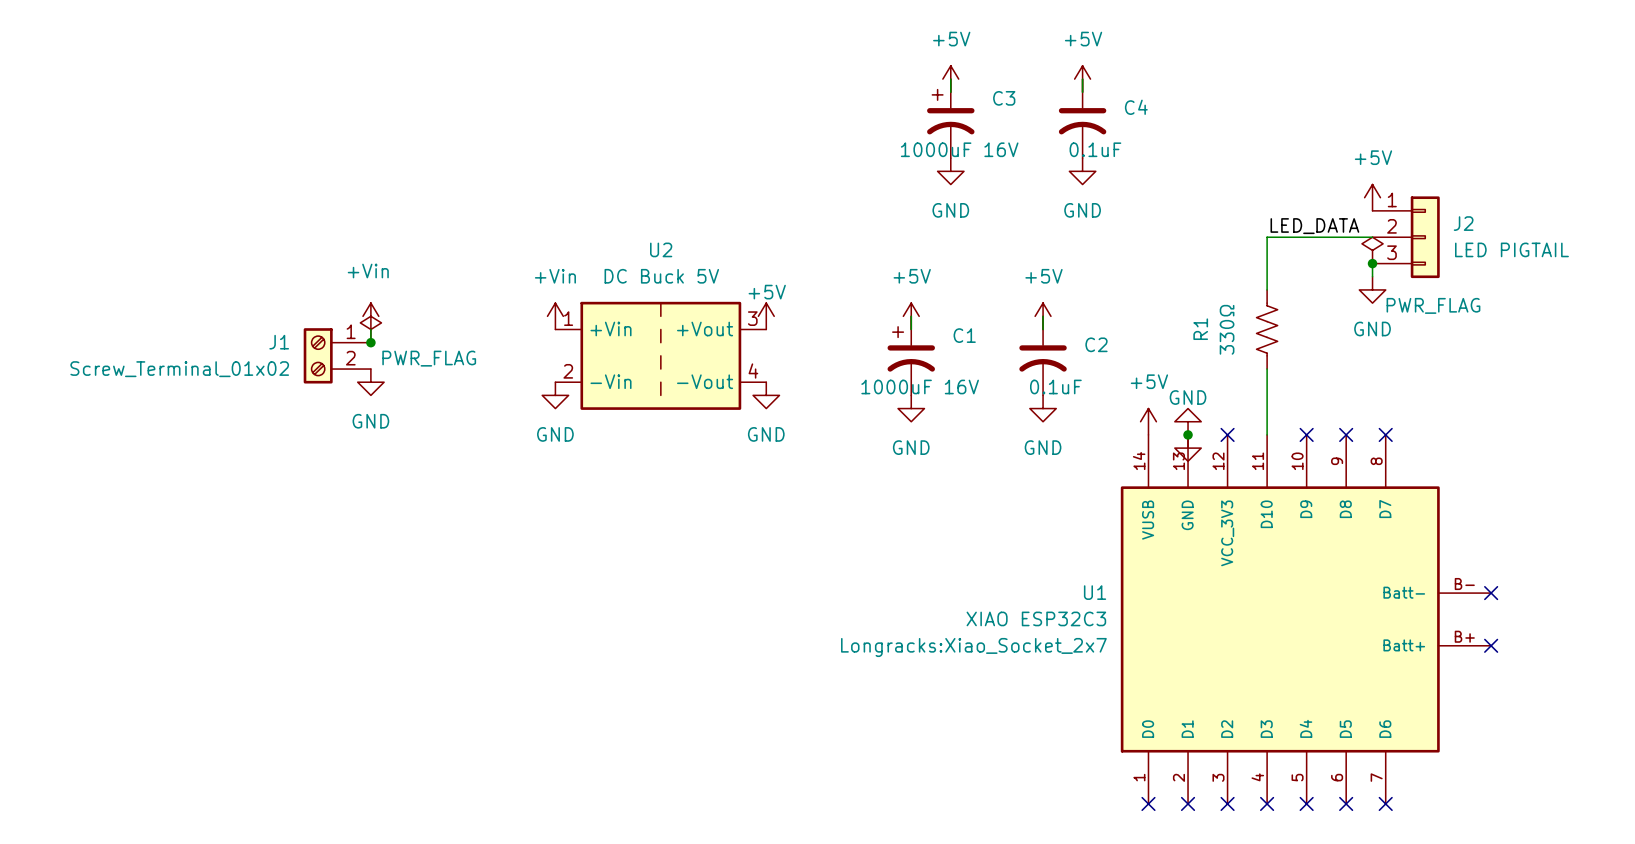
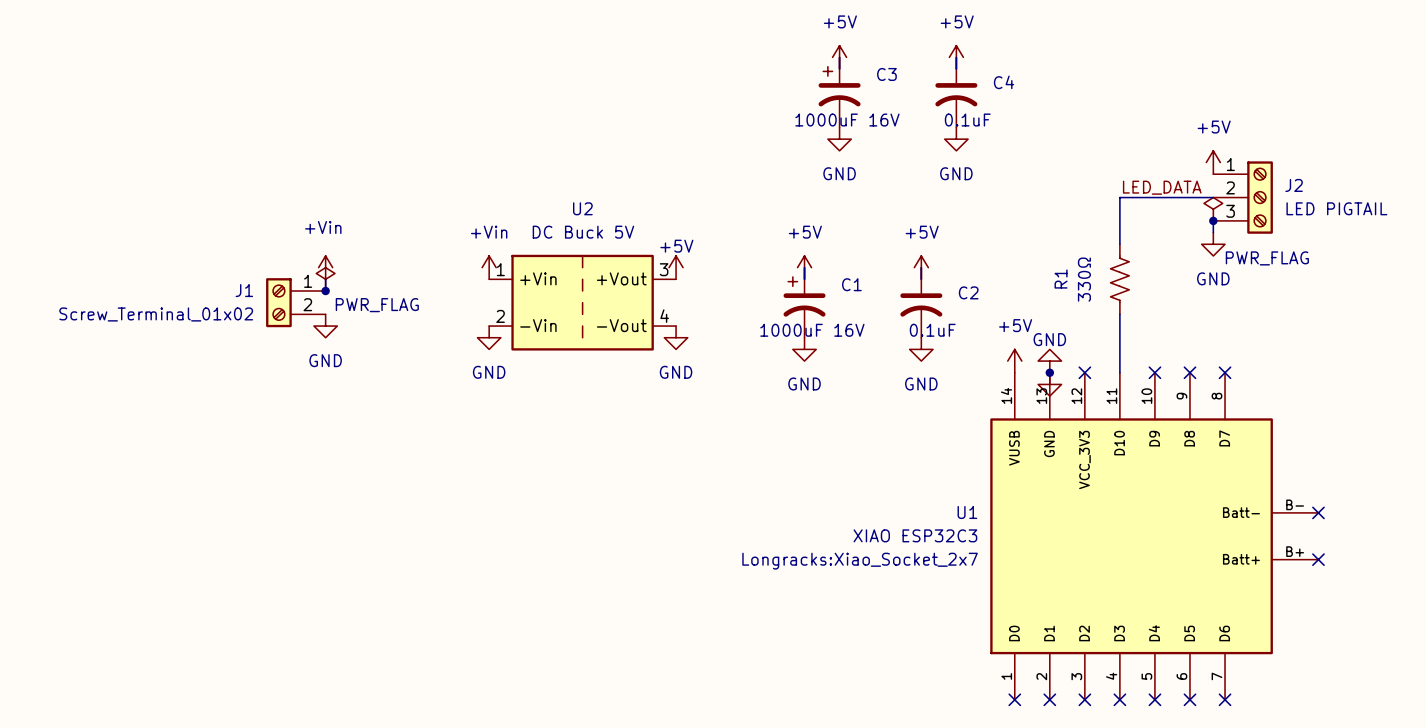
J2 symbol: [1372, 196, 1440, 279] -> [1213, 161, 1273, 234]

